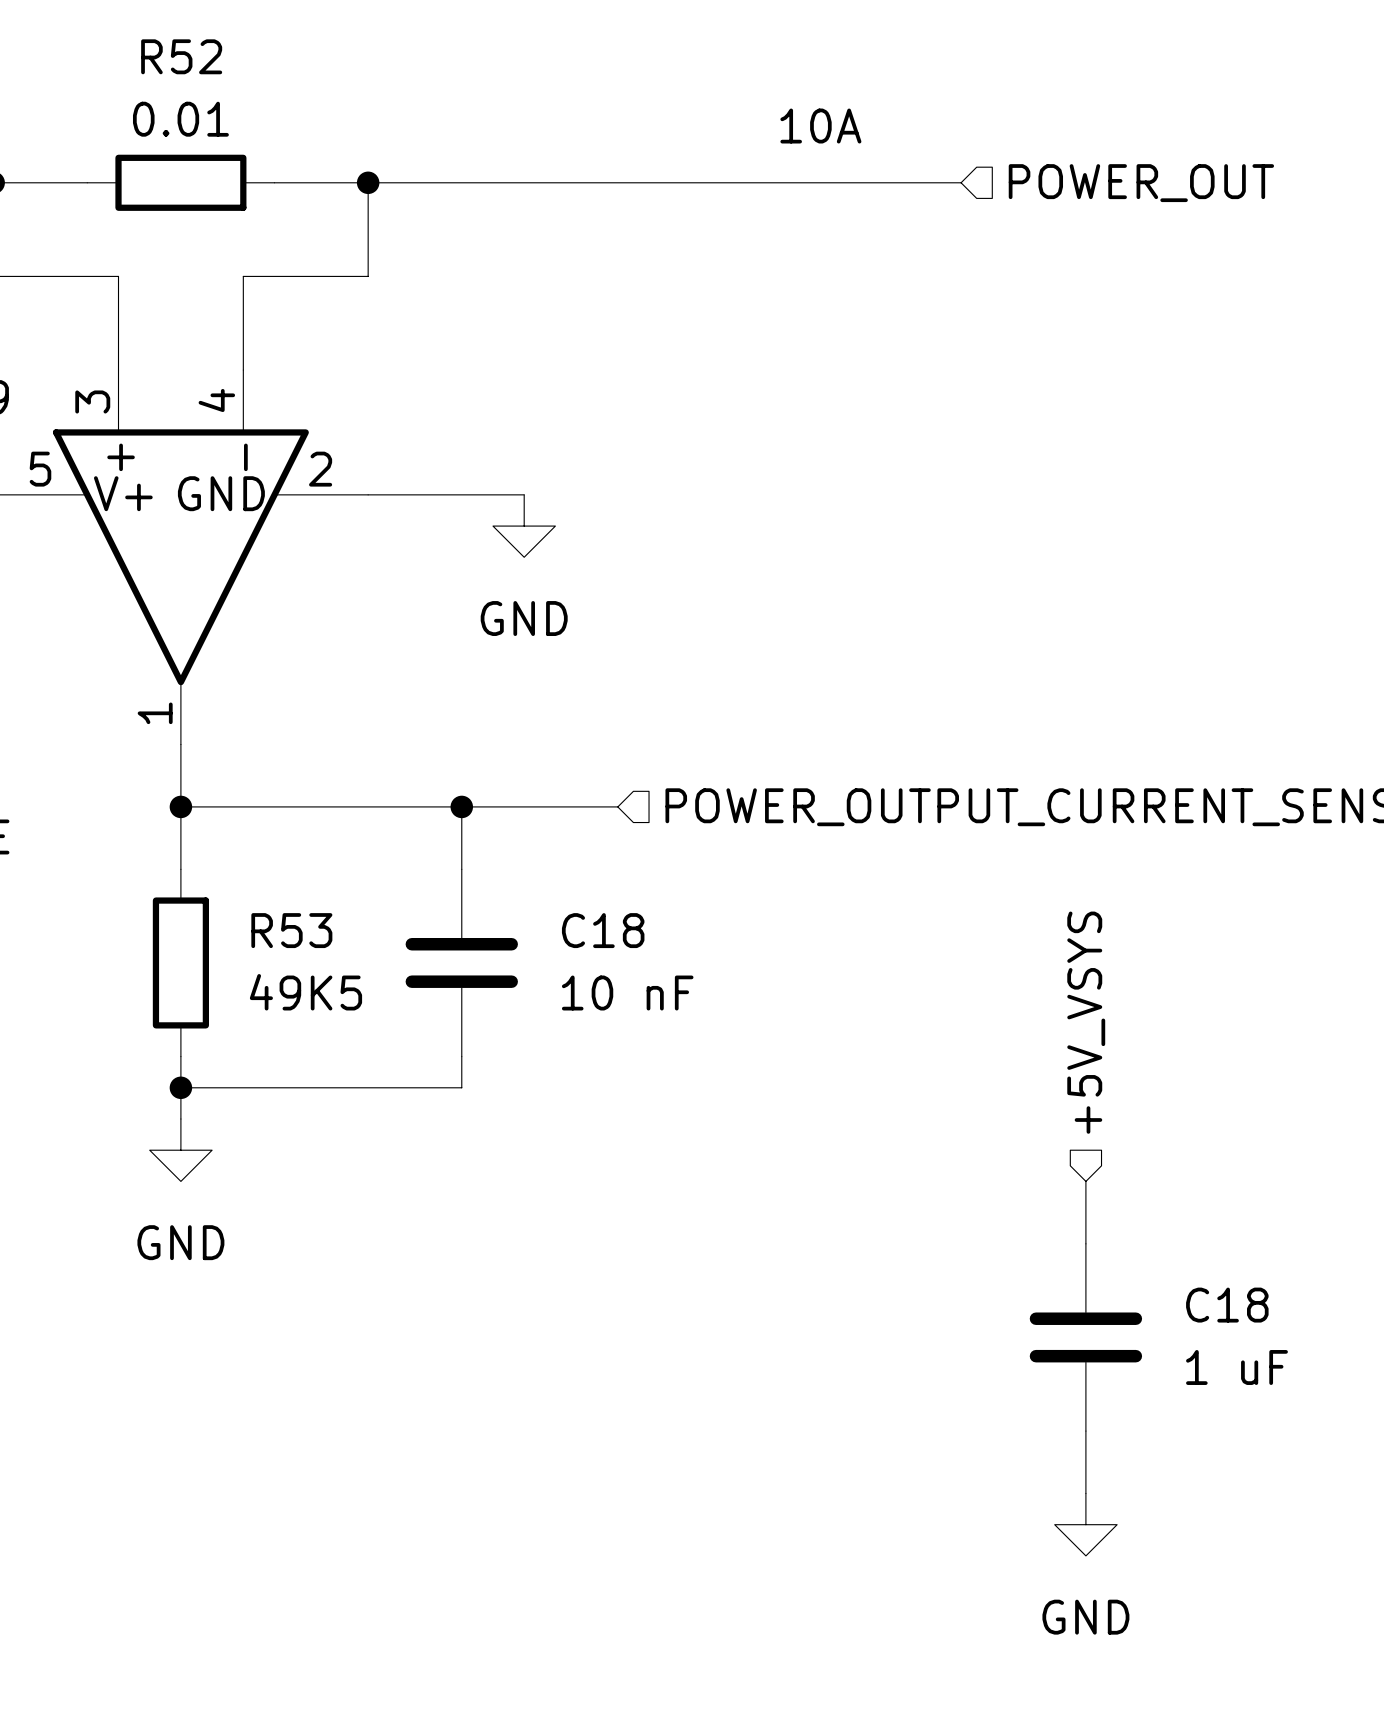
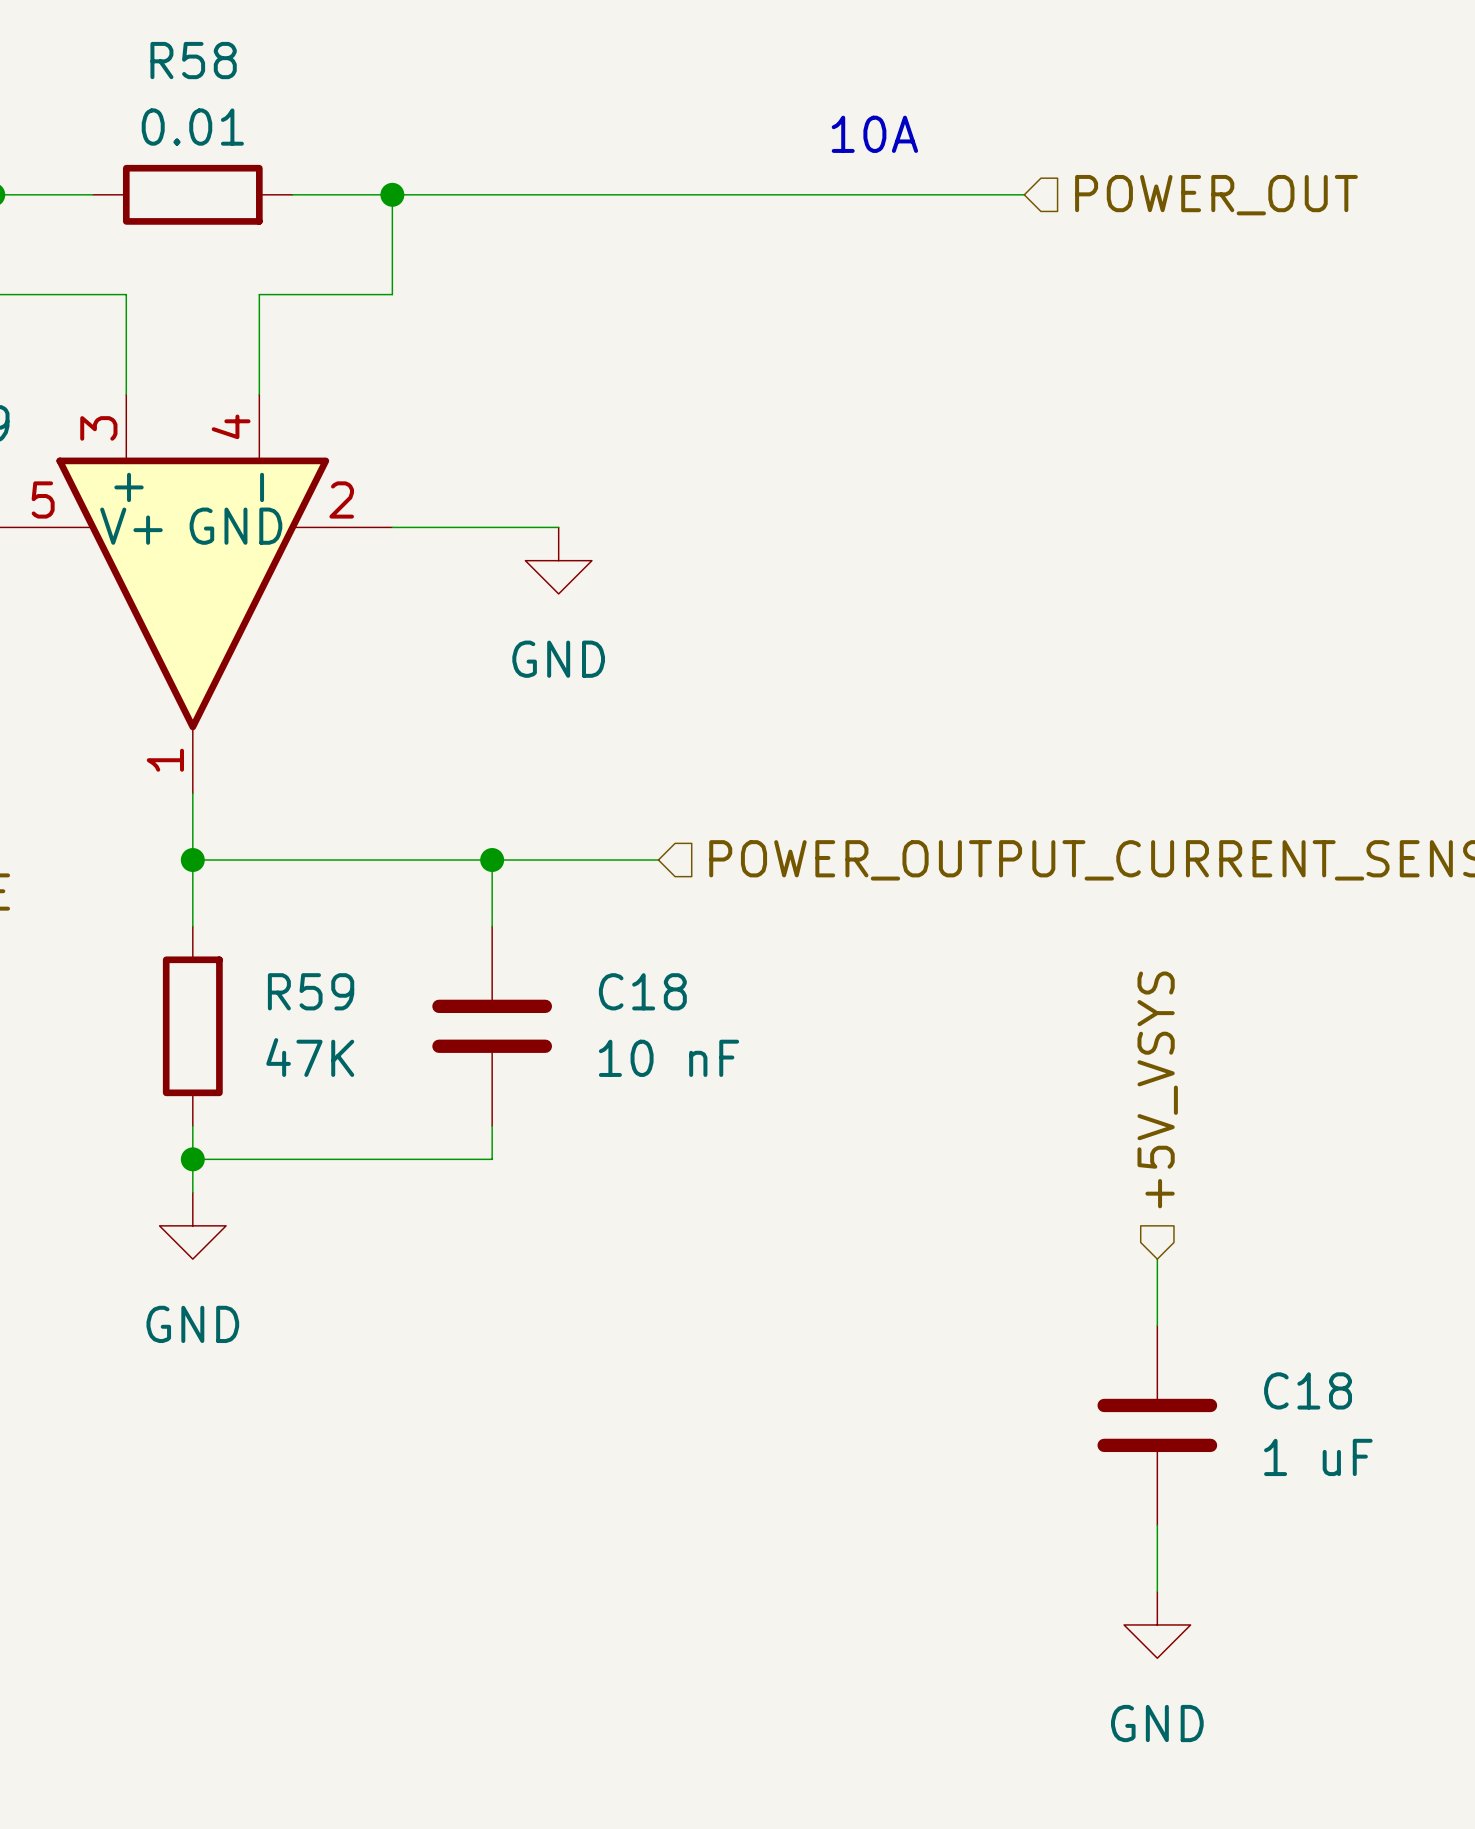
R52 name: R52 (181, 56) -> R58 (193, 60)
R53 name: R53 (291, 930) -> R59 (311, 991)
R53 value: 49K5 (305, 992) -> 47K (310, 1057)

